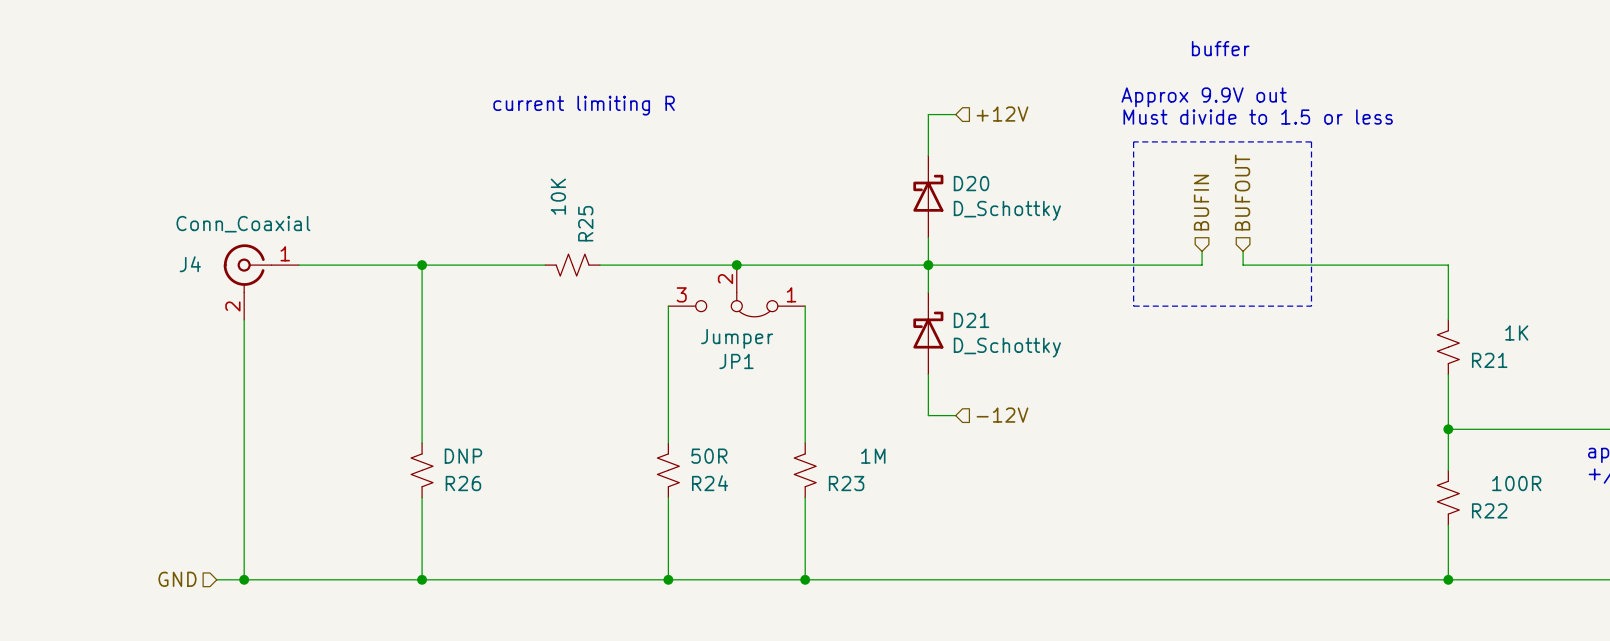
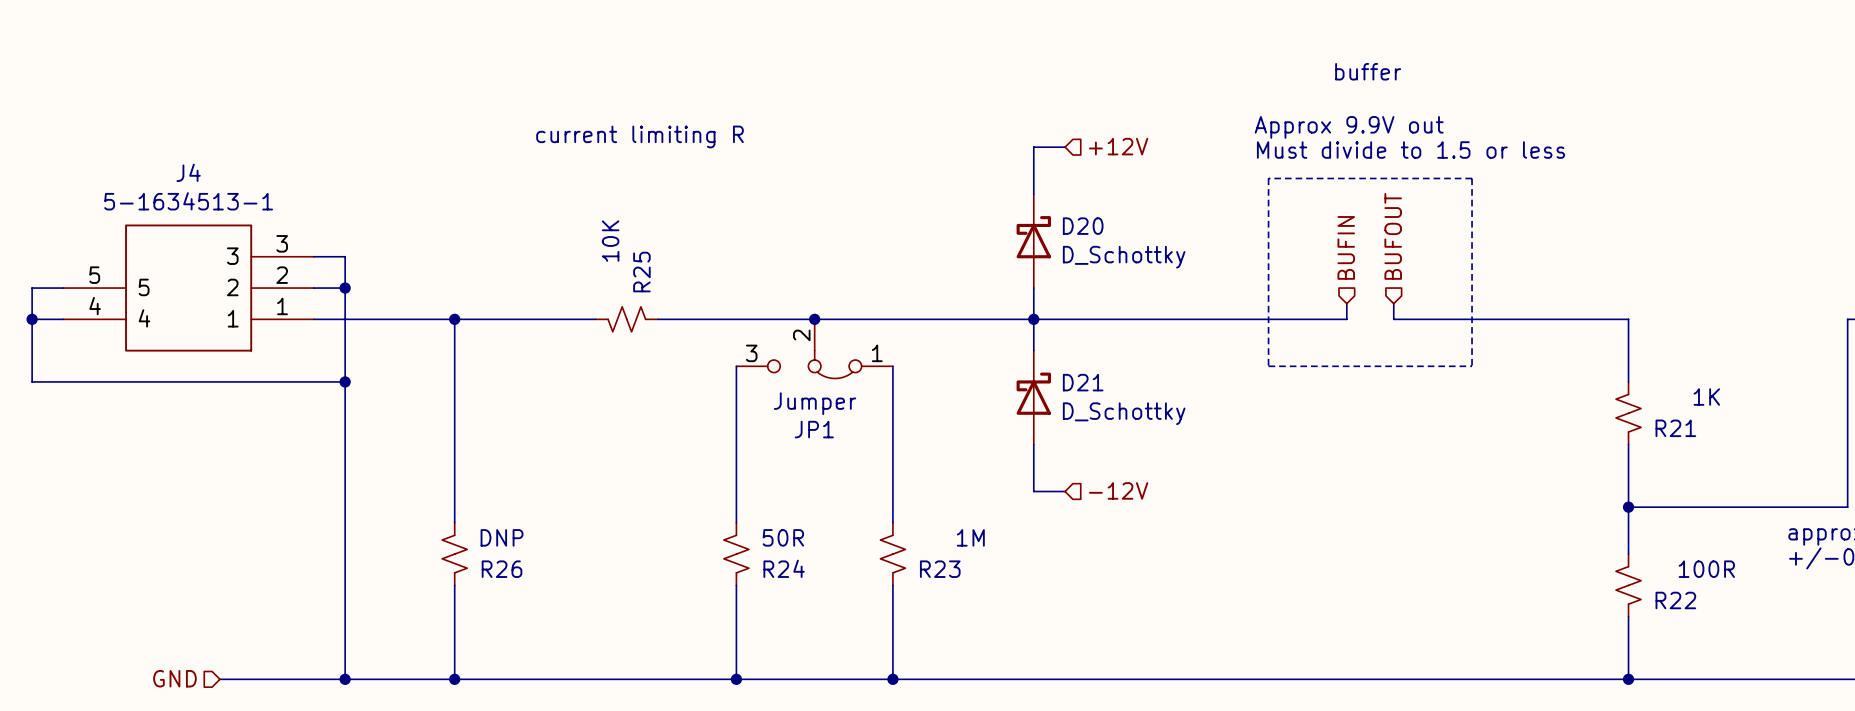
wire: none -> (313, 256) (345, 256) (345, 679)
J4 value: Conn_Coaxial (243, 224) -> 5-1634513-1 (188, 201)
wire: none -> (63, 288) (32, 288) (32, 381) (345, 381)
wire: none -> (313, 288) (345, 288)
junction: none -> (345, 288)
J4 symbol: [223, 244, 299, 320] -> [63, 224, 314, 352]
J4 name position: J4 (190, 264) -> J4 (188, 172)
wire: none -> (32, 319) (63, 319)
junction: none -> (32, 319)
wire: (244, 319) (244, 579) -> none
junction: none -> (345, 381)
junction: (244, 579) -> none
junction: none -> (345, 679)

